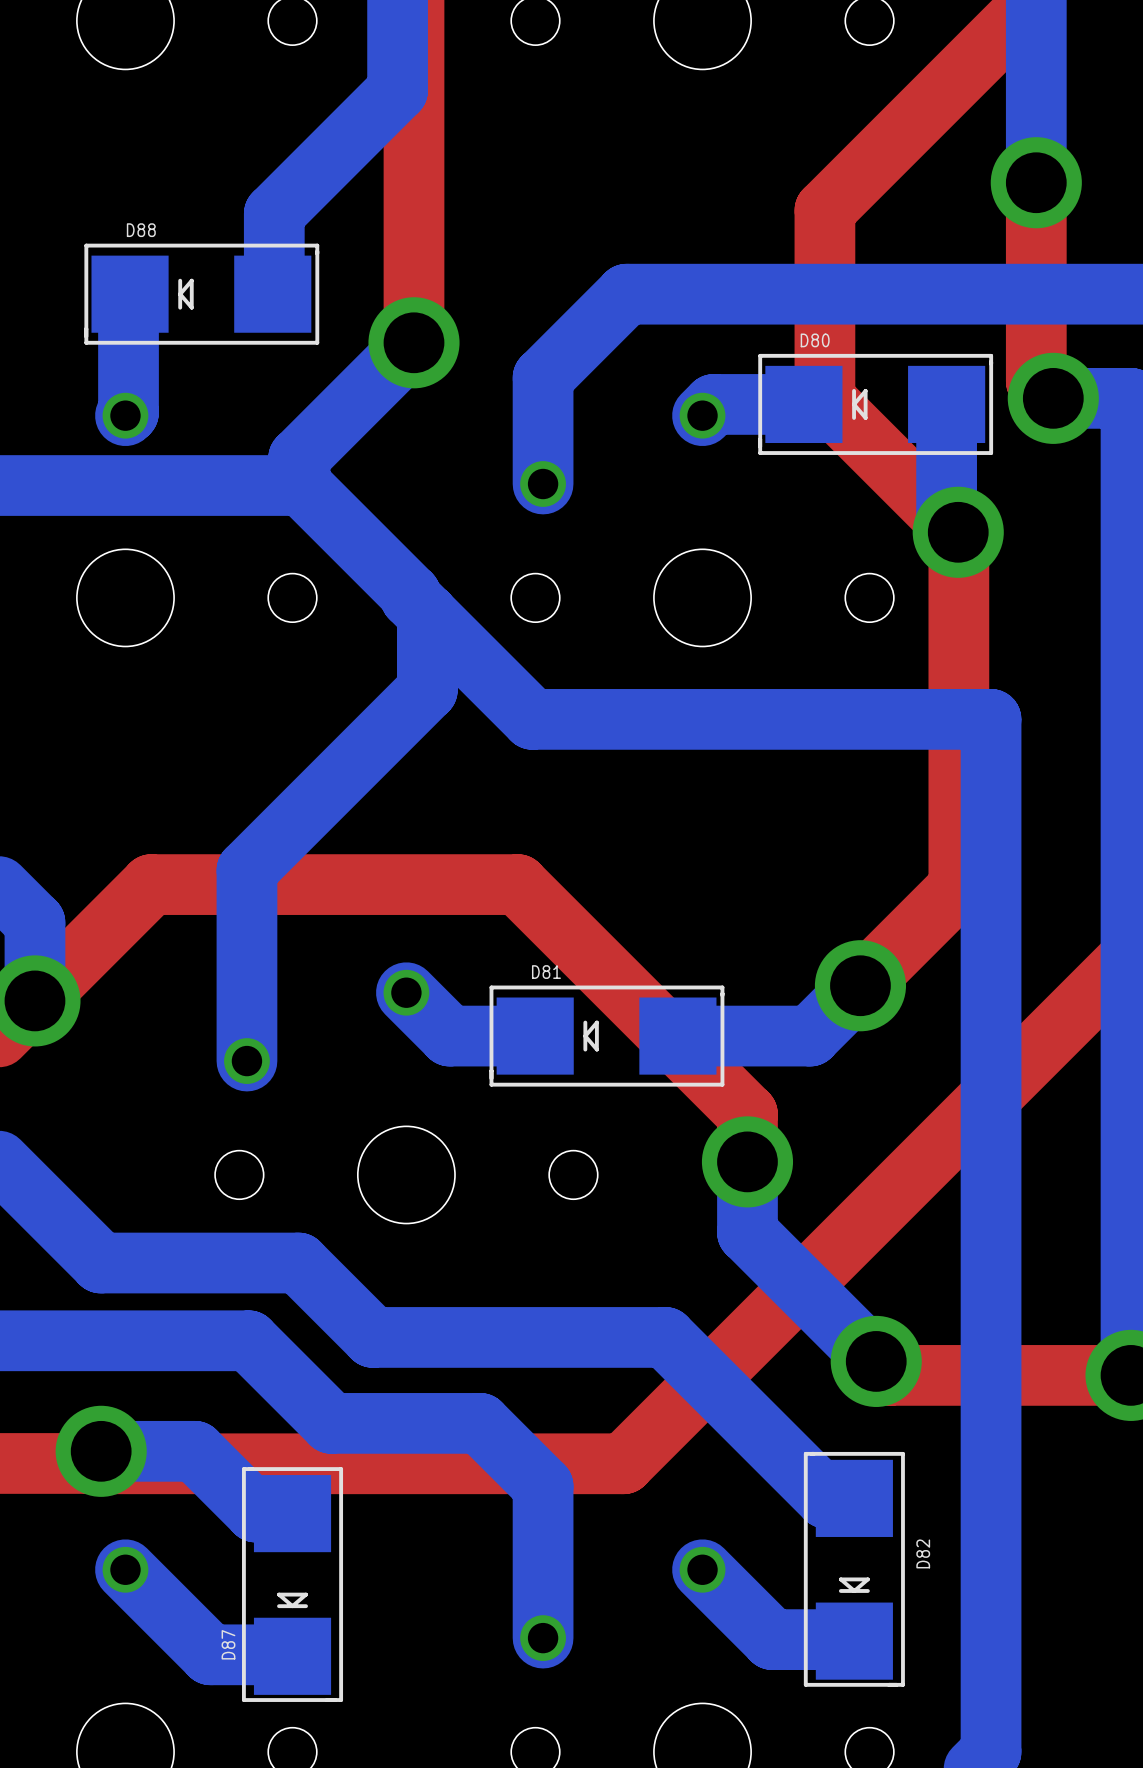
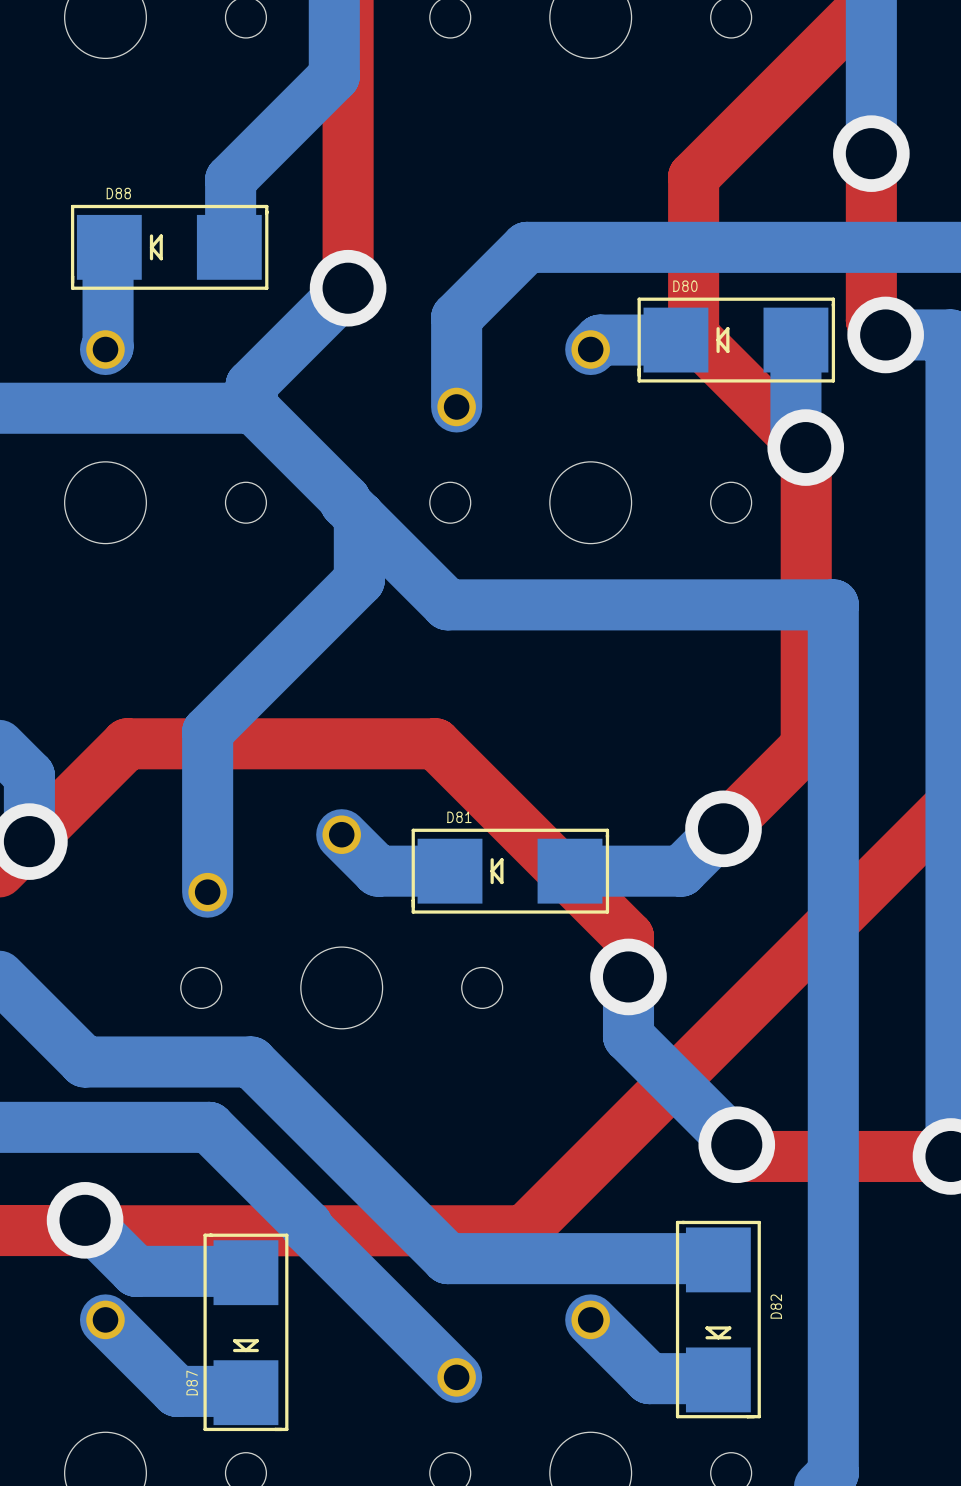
bottom track: (373, 1337) (665, 1337) (826, 1498) (854, 1498) -> (313, 1124) (447, 1258) (718, 1259)
bottom track: (331, 1423) (480, 1423) (543, 1486) (543, 1638) -> (278, 1196) (307, 1225) (307, 1227) (456, 1377)
bottom track: (101, 1451) (195, 1451) (255, 1512) -> (85, 1220) (136, 1271) (215, 1271)

